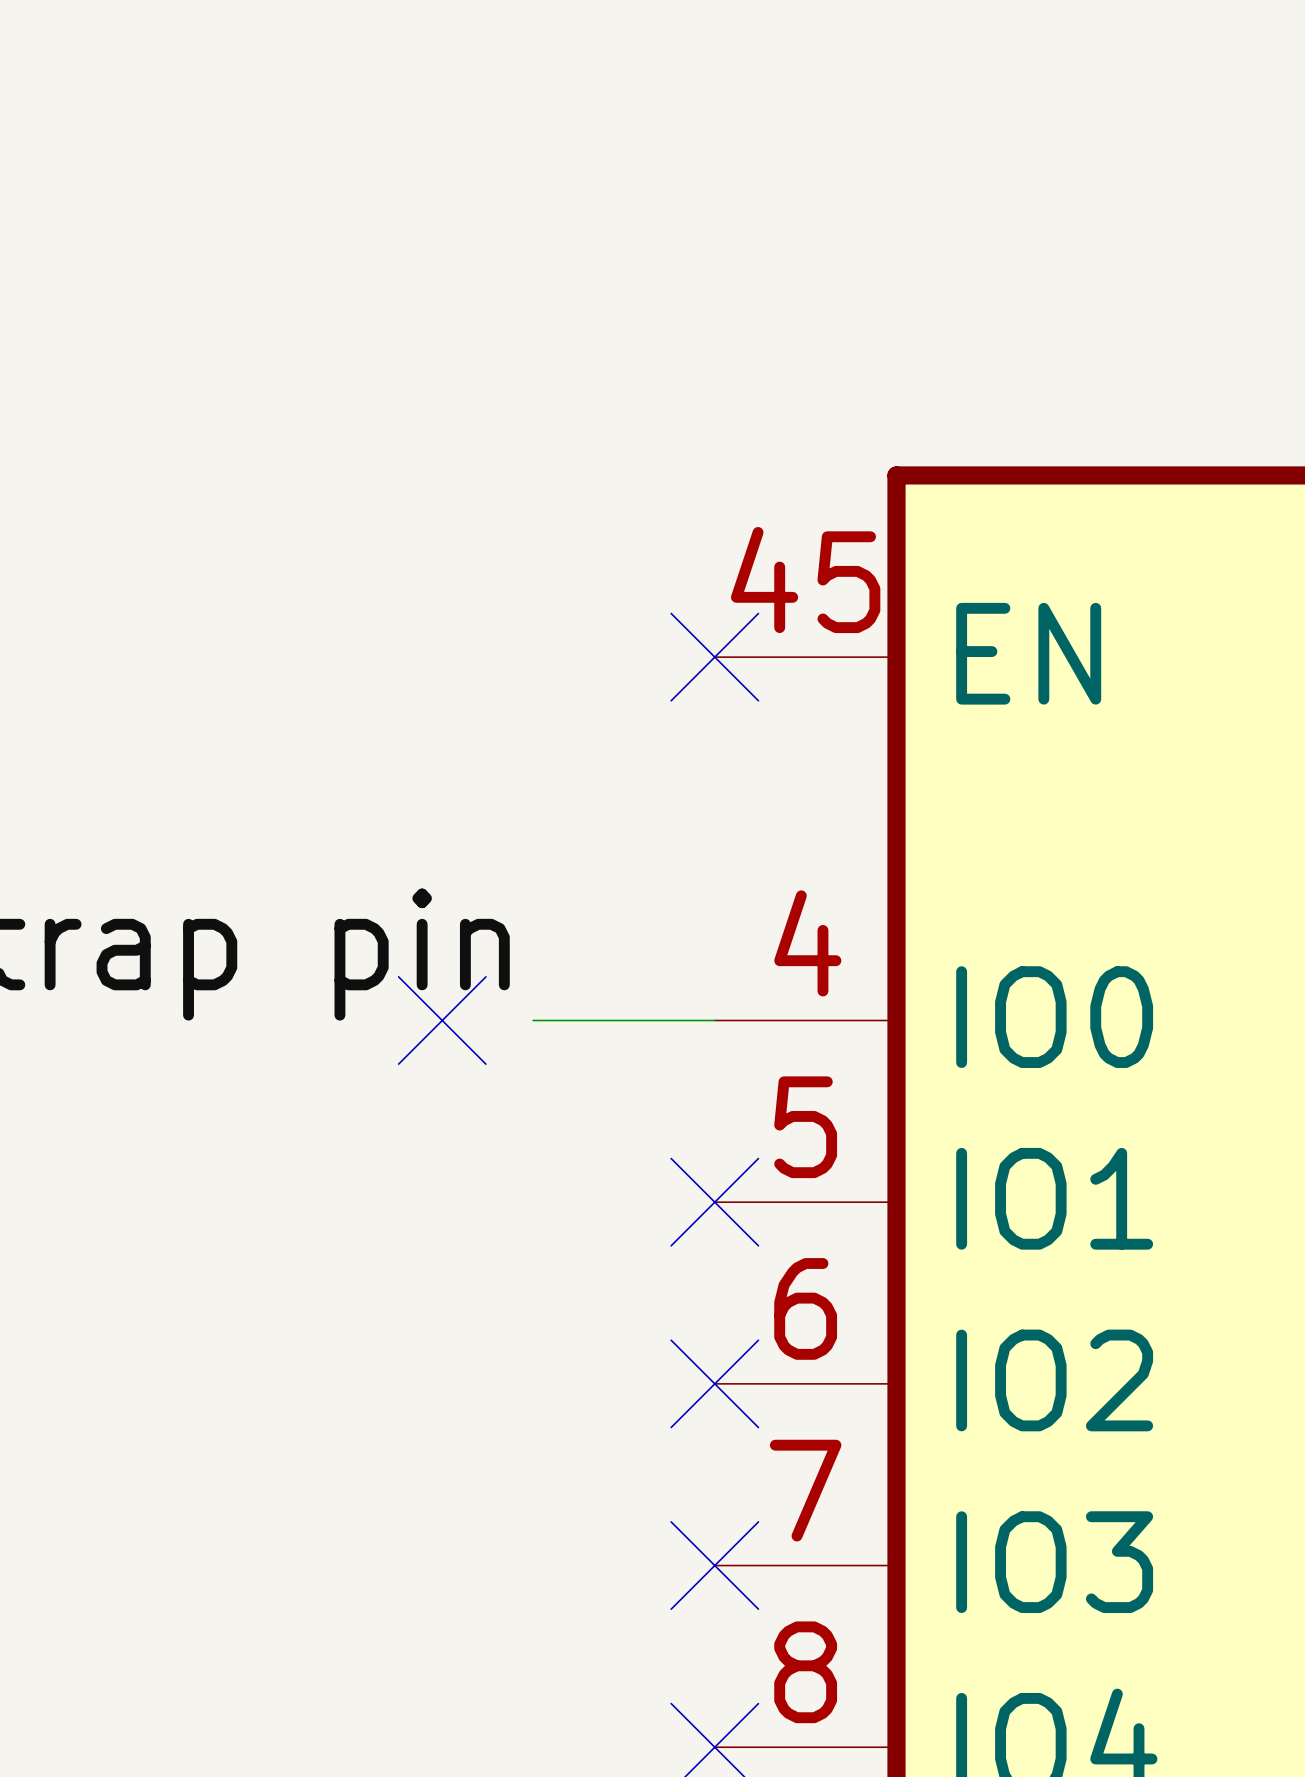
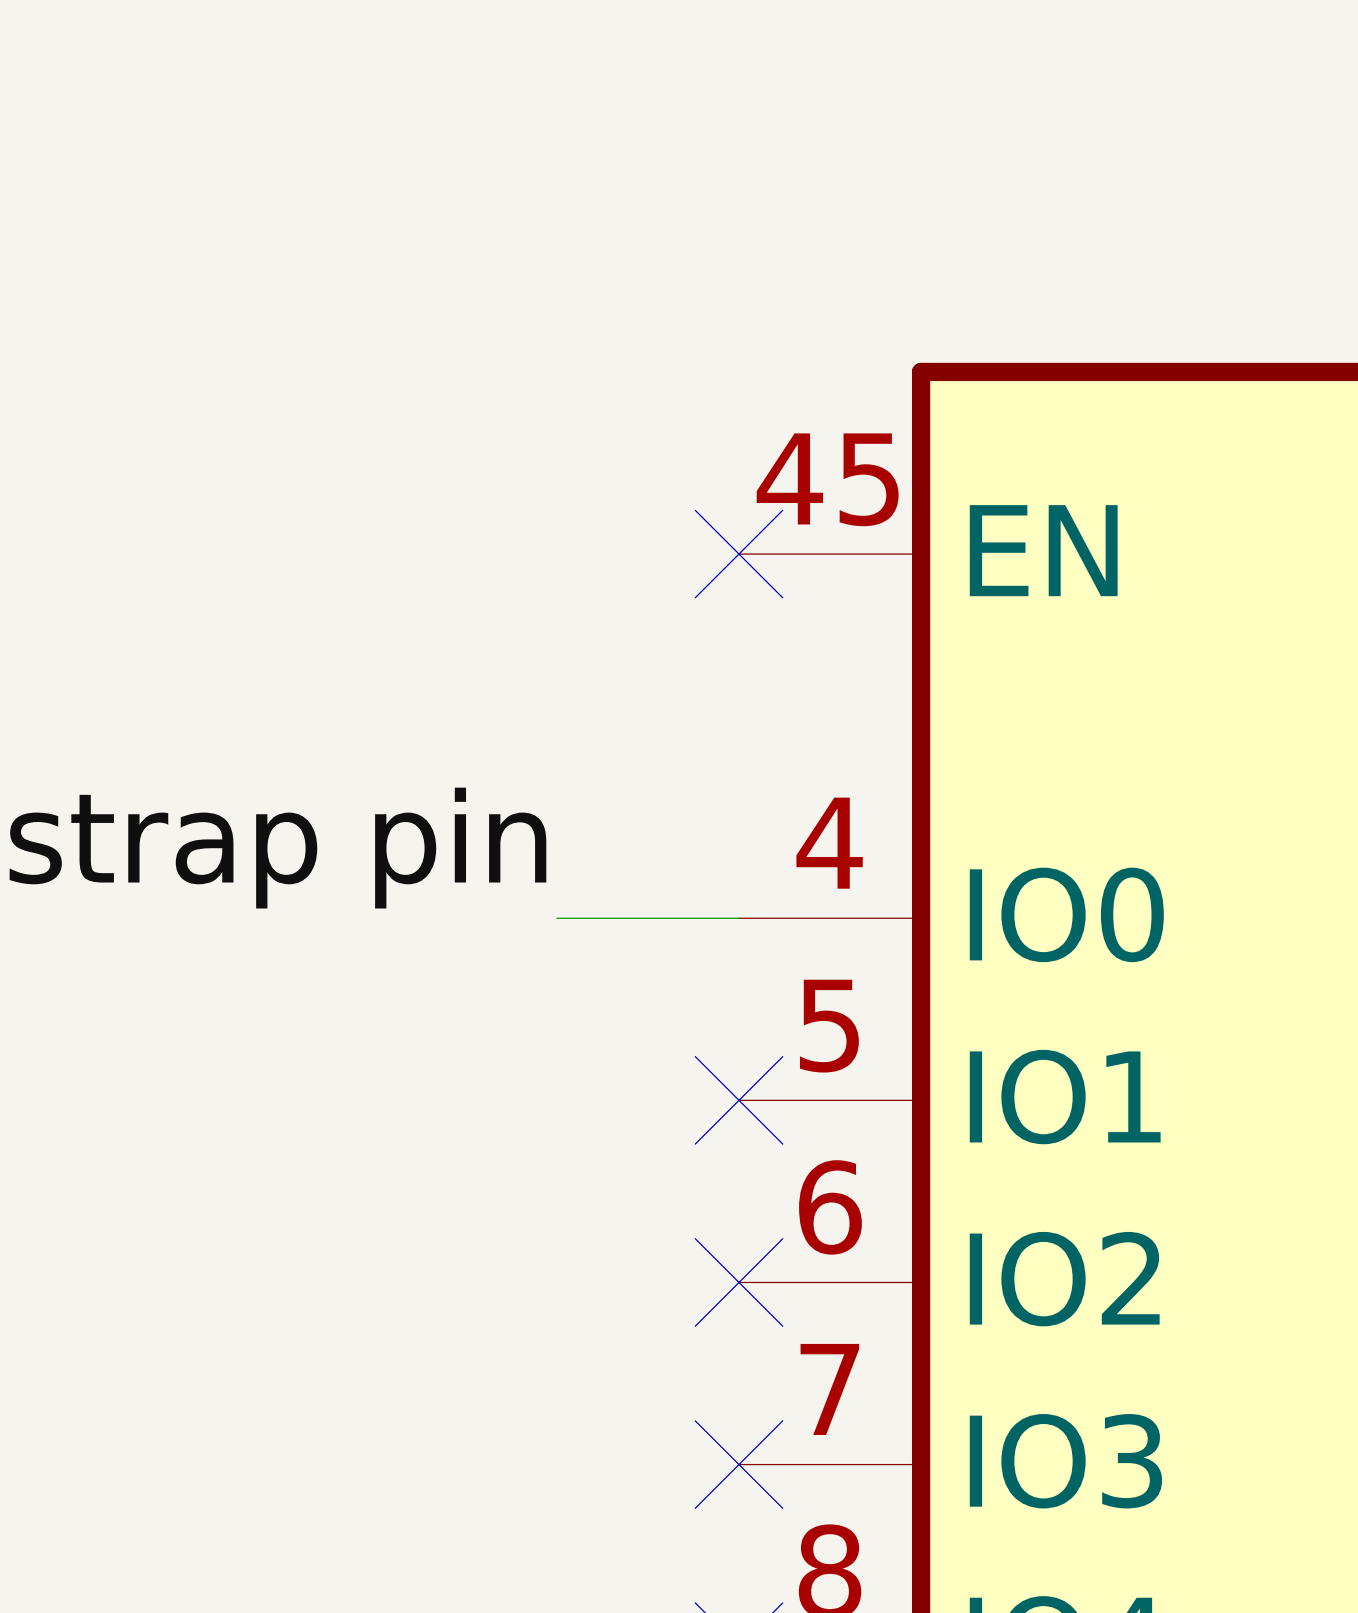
no-connect mark: (442, 1020) -> none

